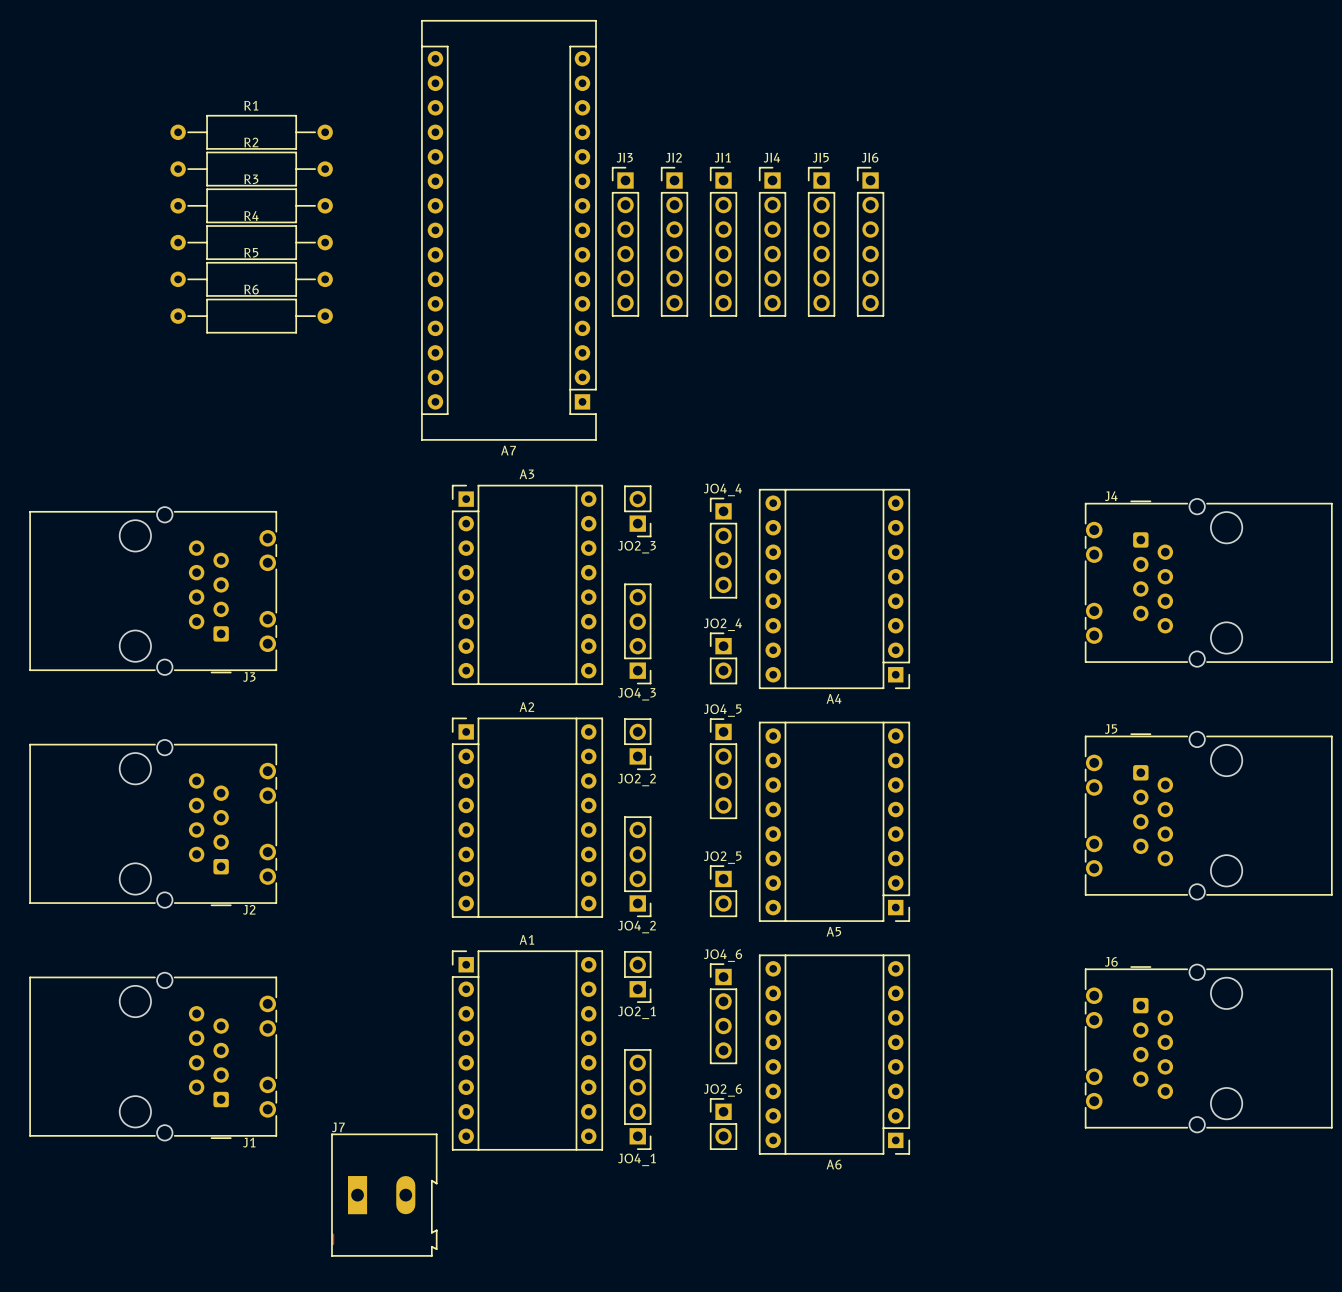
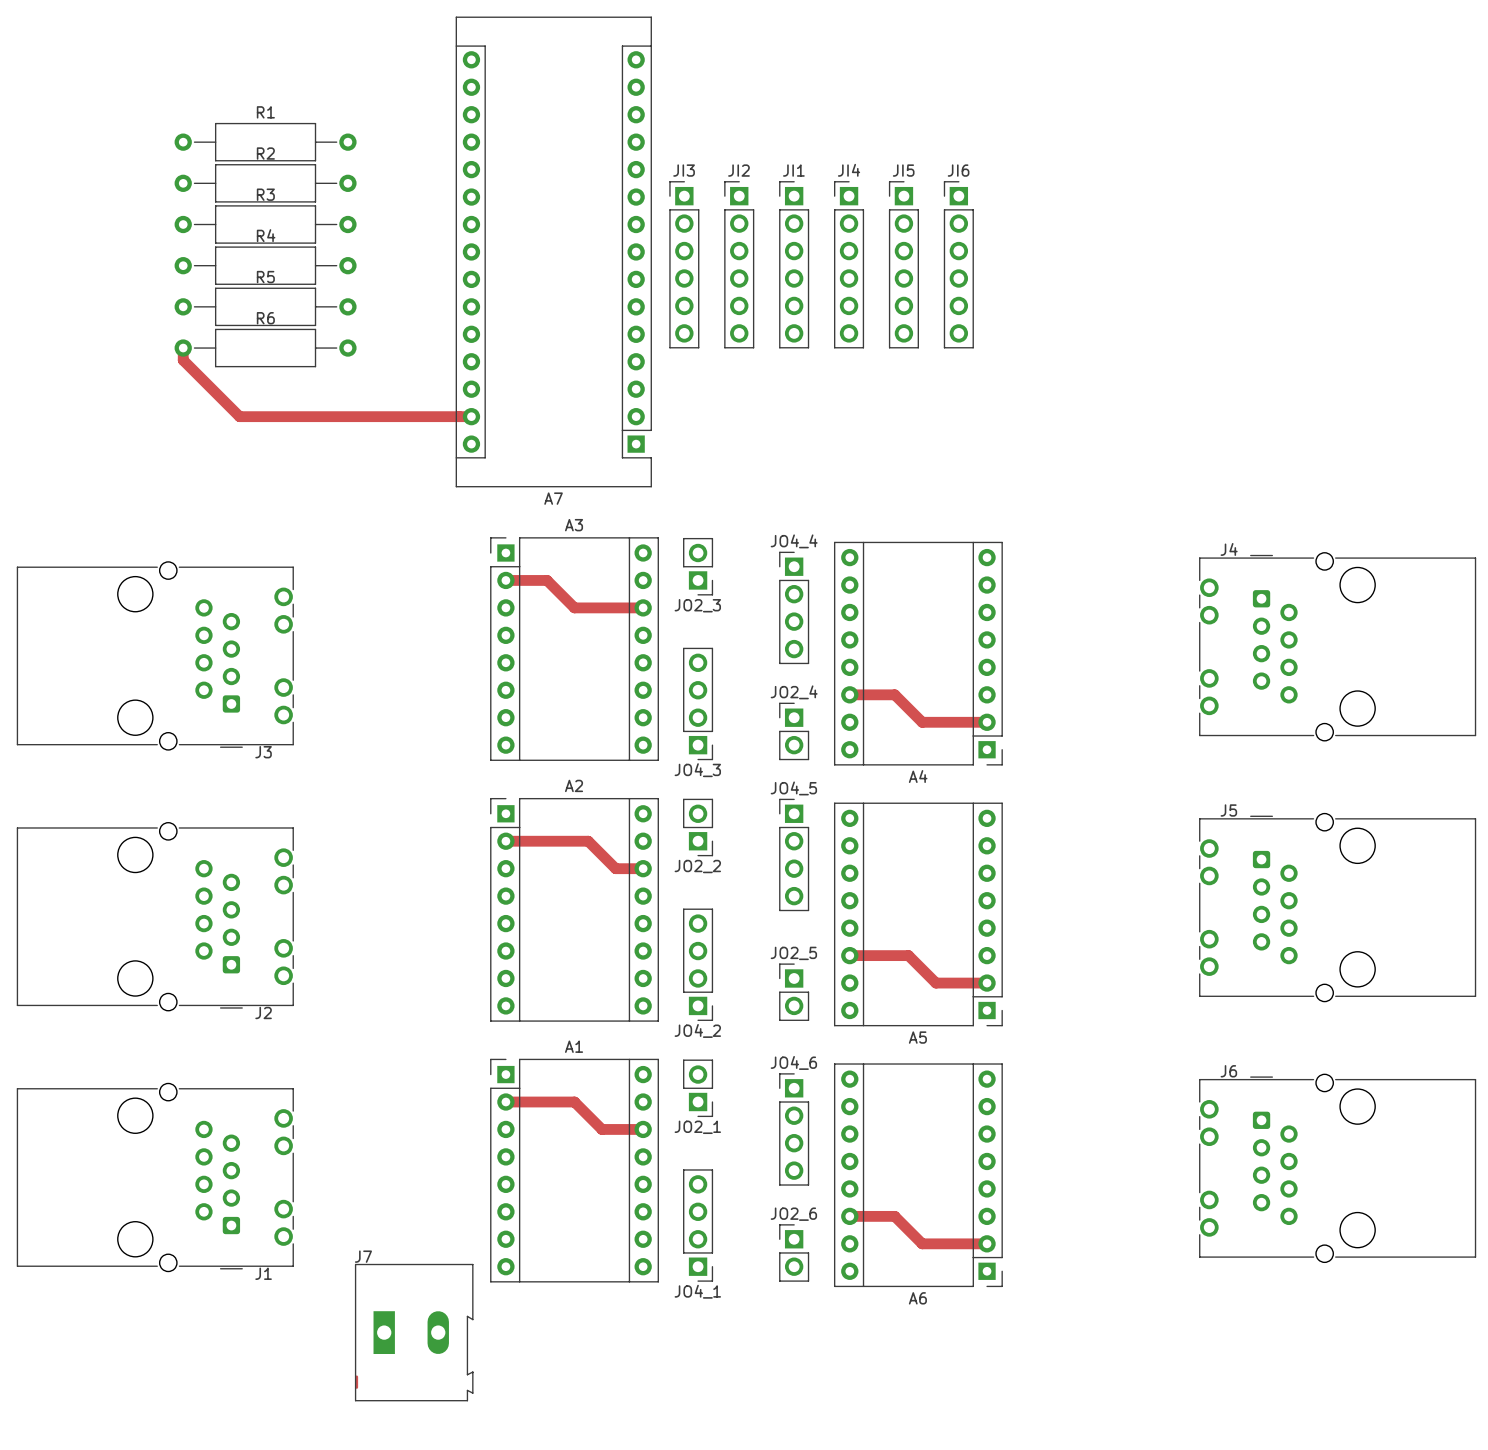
track: none -> (183, 348) (183, 360) (239, 416) (471, 416)
track: none -> (505, 580) (547, 580) (574, 607) (643, 607)
track: none -> (849, 694) (894, 694) (922, 722) (987, 722)
track: none -> (505, 841) (588, 841) (615, 868) (643, 868)
track: none -> (849, 955) (908, 955) (935, 983) (987, 983)
track: none -> (505, 1102) (574, 1102) (601, 1129) (643, 1129)
track: none -> (849, 1216) (894, 1216) (922, 1243) (987, 1243)

